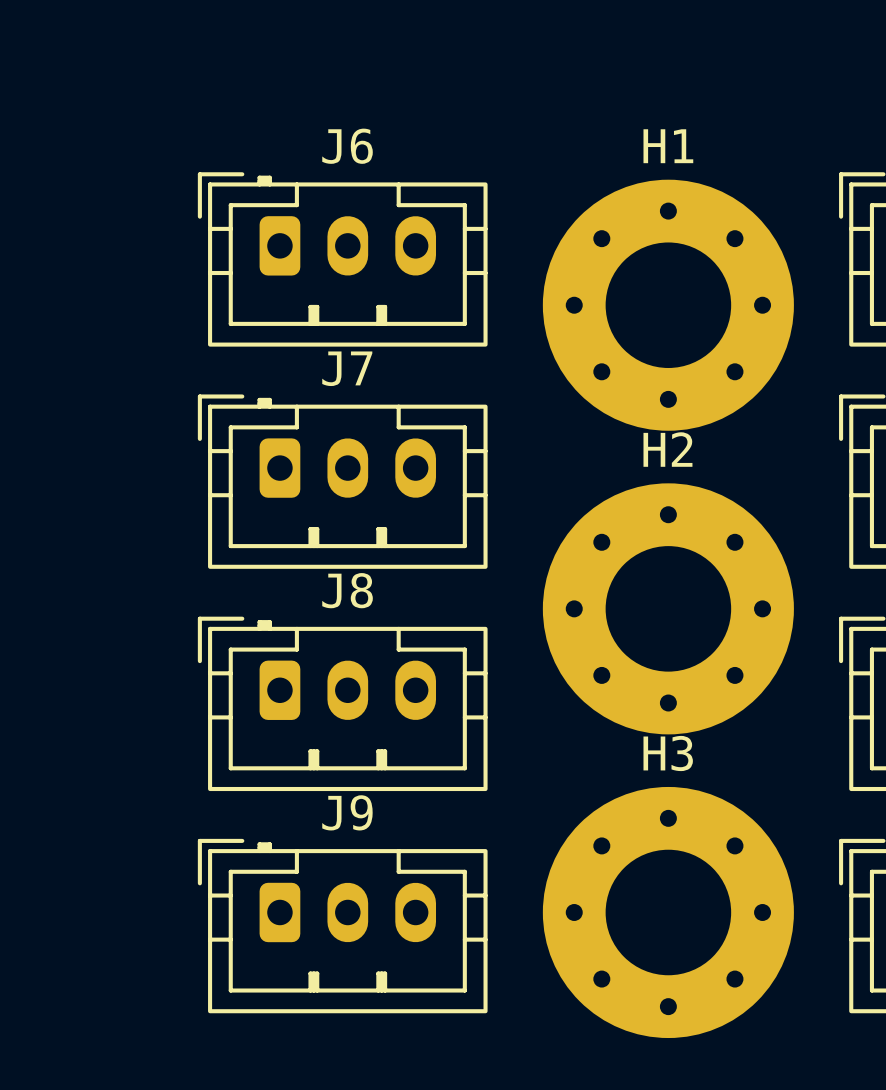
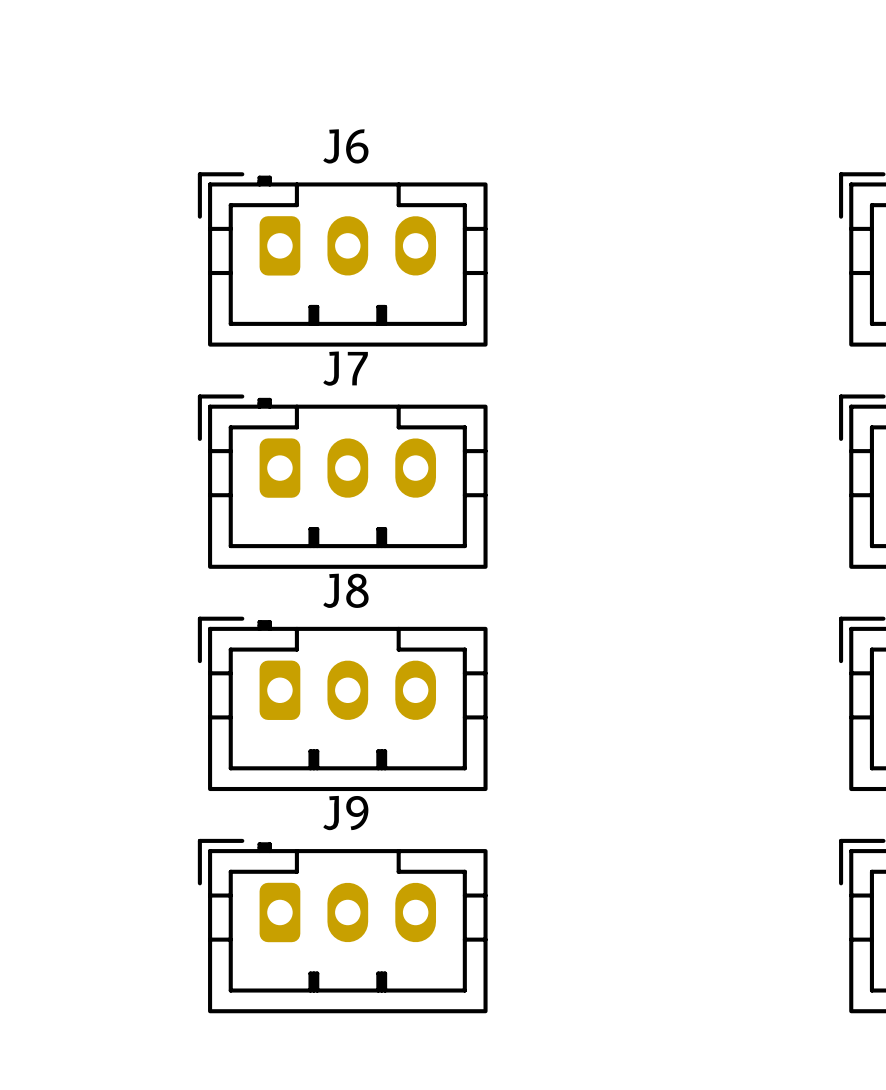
H1: (668, 305) -> none
H2: (668, 608) -> none
H3: (668, 912) -> none

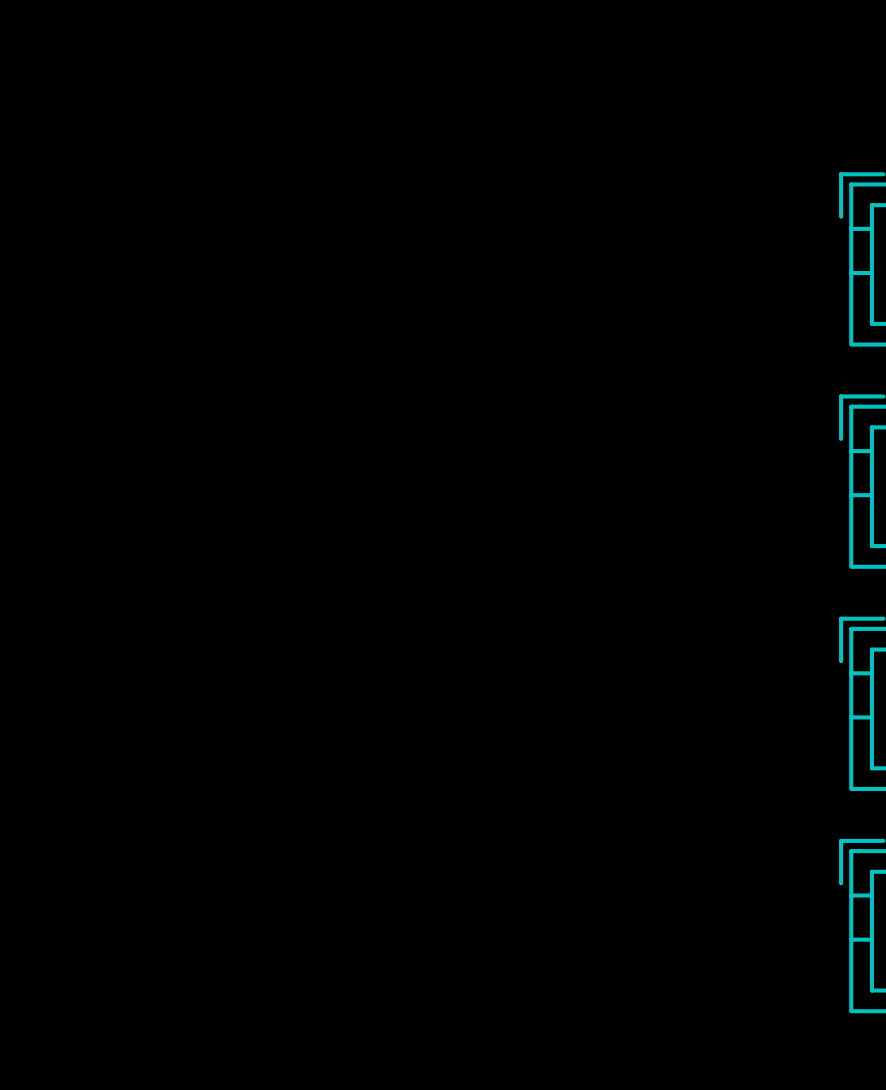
J6: (342, 259) -> none
J7: (342, 481) -> none
J8: (342, 703) -> none
J9: (342, 926) -> none

